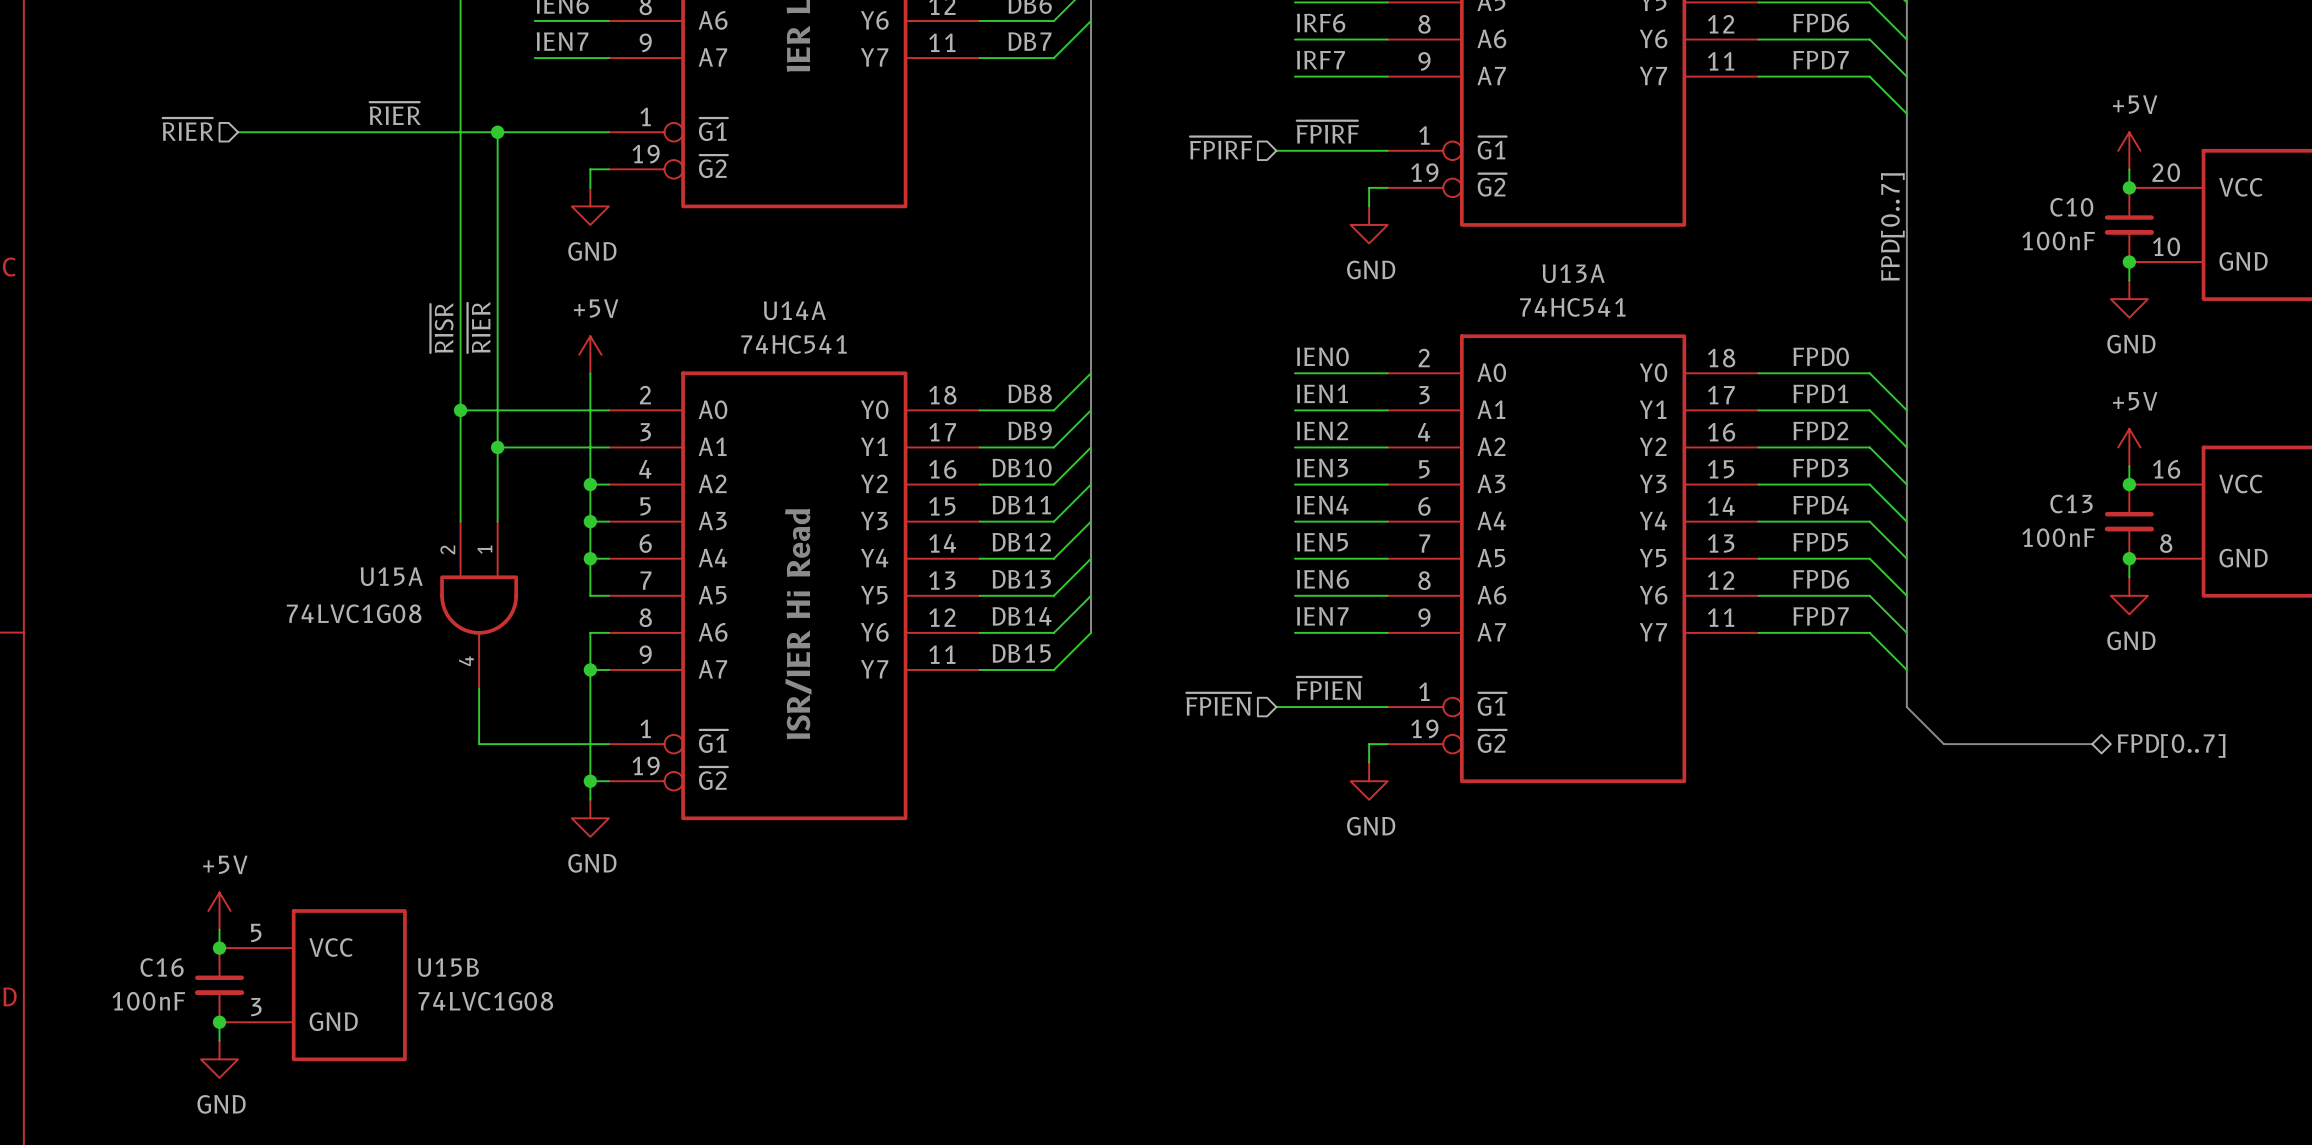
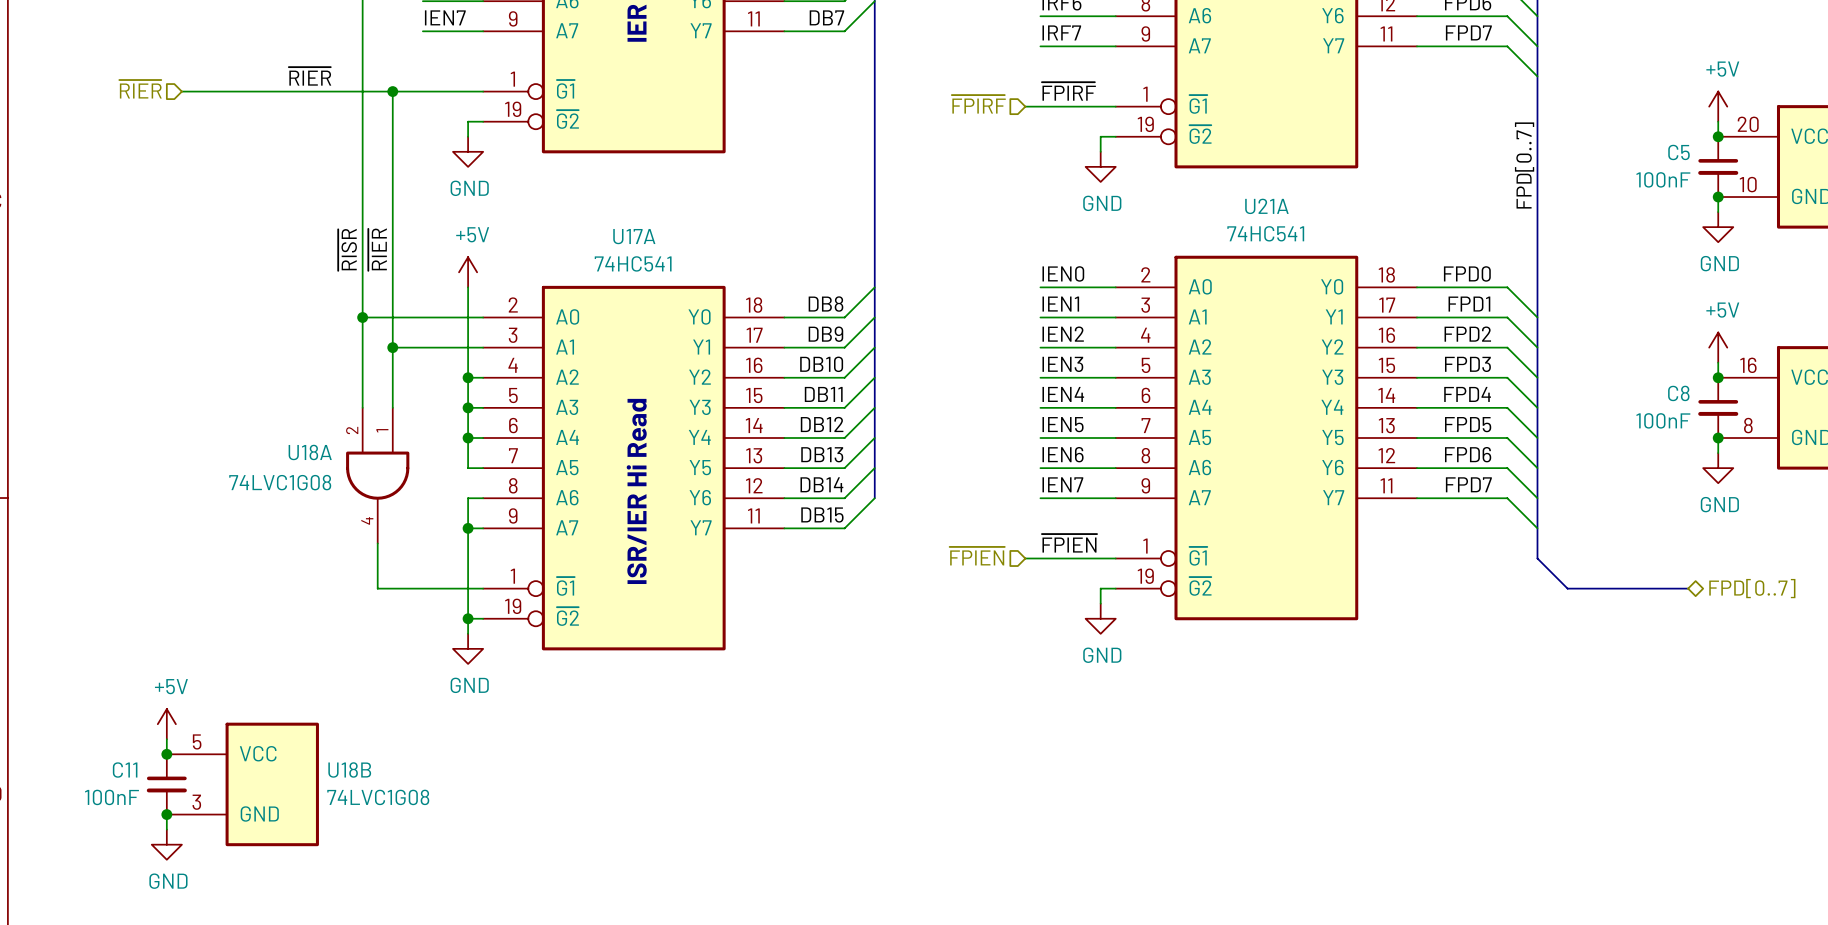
C10 name: C10 (2071, 207) -> C5 (1679, 152)
U13A name: U13A (1573, 273) -> U21A (1266, 206)
U14A name: U14A (794, 310) -> U17A (634, 236)
C13 name: C13 (2071, 503) -> C8 (1678, 393)
U15A name: U15A (391, 576) -> U18A (310, 452)
C16 name: C16 (162, 967) -> C11 (125, 770)
U15B name: U15B (448, 967) -> U18B (349, 769)

